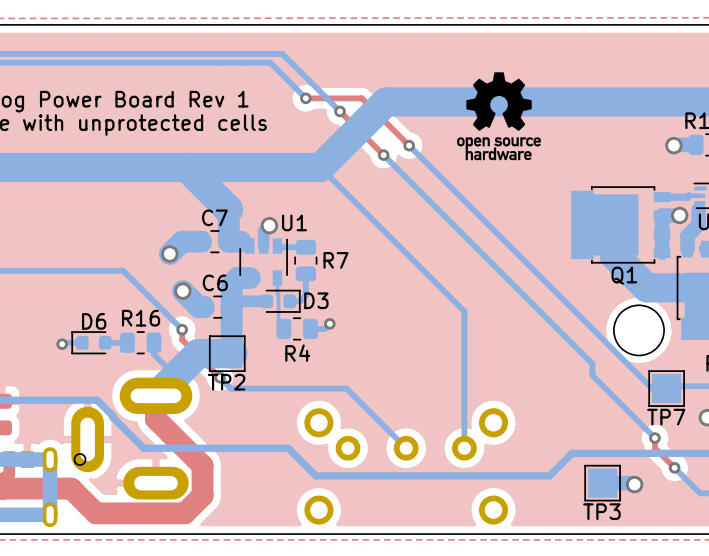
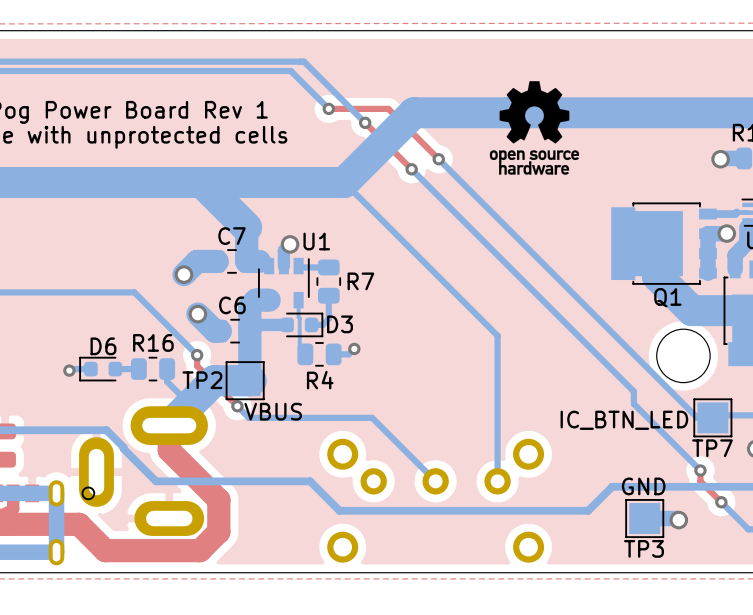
TP2 name position: TP2 (226, 382) -> TP2 (202, 380)
text: none -> VBUS (273, 411)
text: none -> IC_BTN_LED (624, 420)
text: none -> GND (643, 486)

